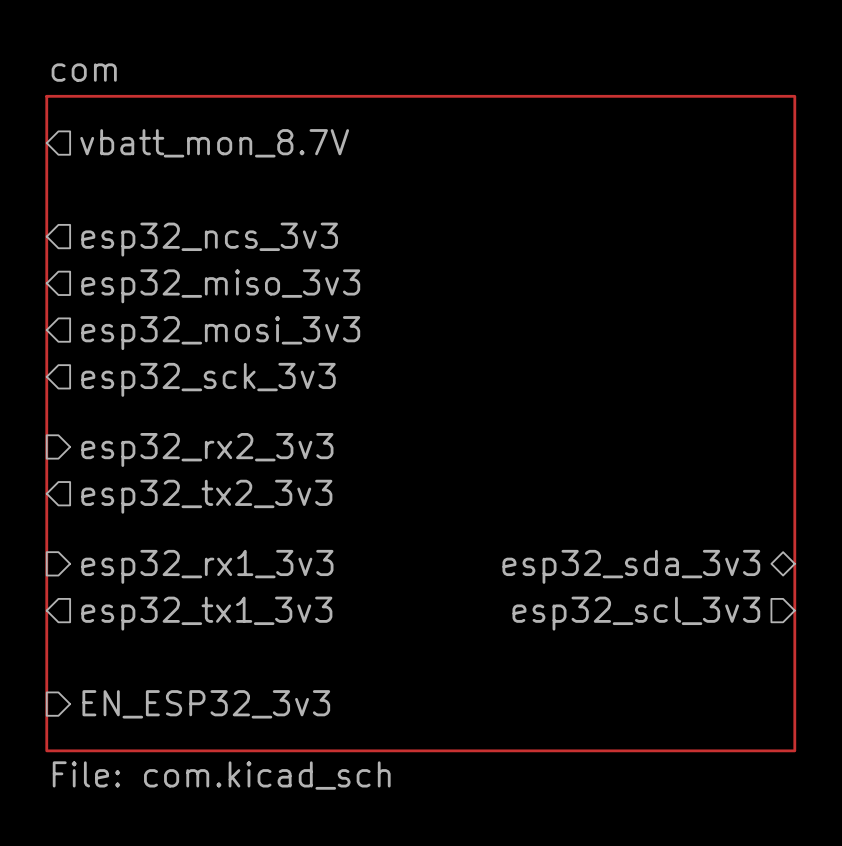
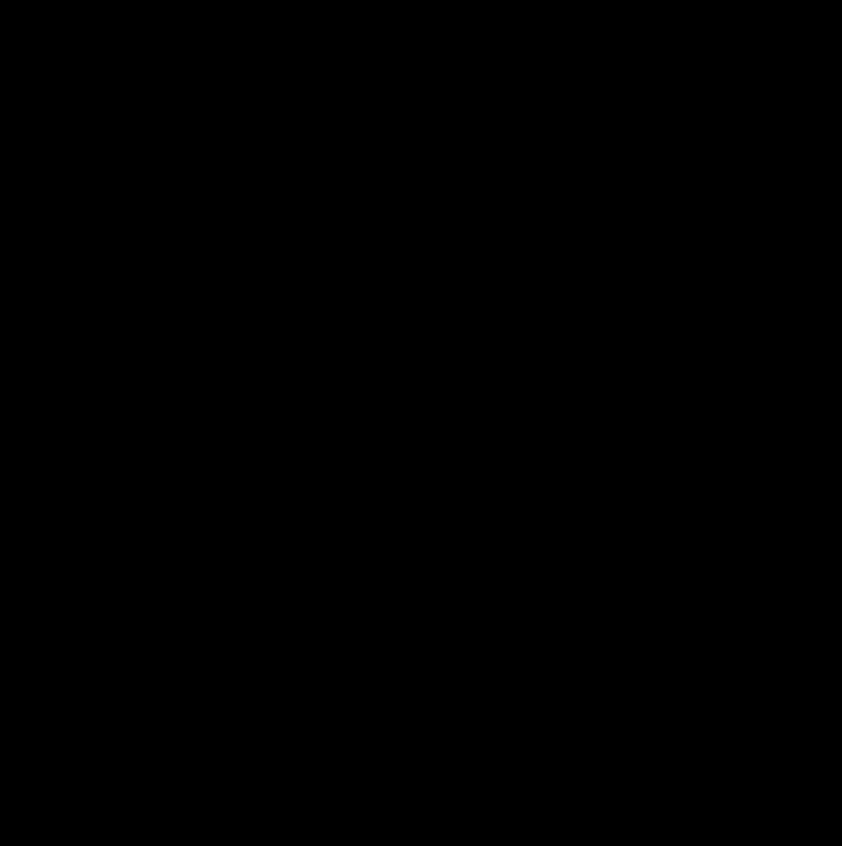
sheet pin: vbatt_mon_8.7V (214, 143) -> none
sheet pin: esp32_ncs_3v3 (209, 239) -> none
sheet pin: esp32_miso_3v3 (220, 286) -> none
sheet pin: esp32_mosi_3v3 (220, 333) -> none
sheet pin: esp32_sck_3v3 (208, 379) -> none
sheet com: File: com.kicad_sch (420, 423) -> none
sheet pin: esp32_rx2_3v3 (207, 449) -> none
sheet pin: esp32_tx2_3v3 (206, 496) -> none
sheet pin: esp32_rx1_3v3 (207, 566) -> none
sheet pin: esp32_sda_3v3 (631, 566) -> none
sheet pin: esp32_tx1_3v3 (206, 613) -> none
sheet pin: esp32_scl_3v3 (636, 613) -> none
sheet pin: EN_ESP32_3v3 (206, 704) -> none

